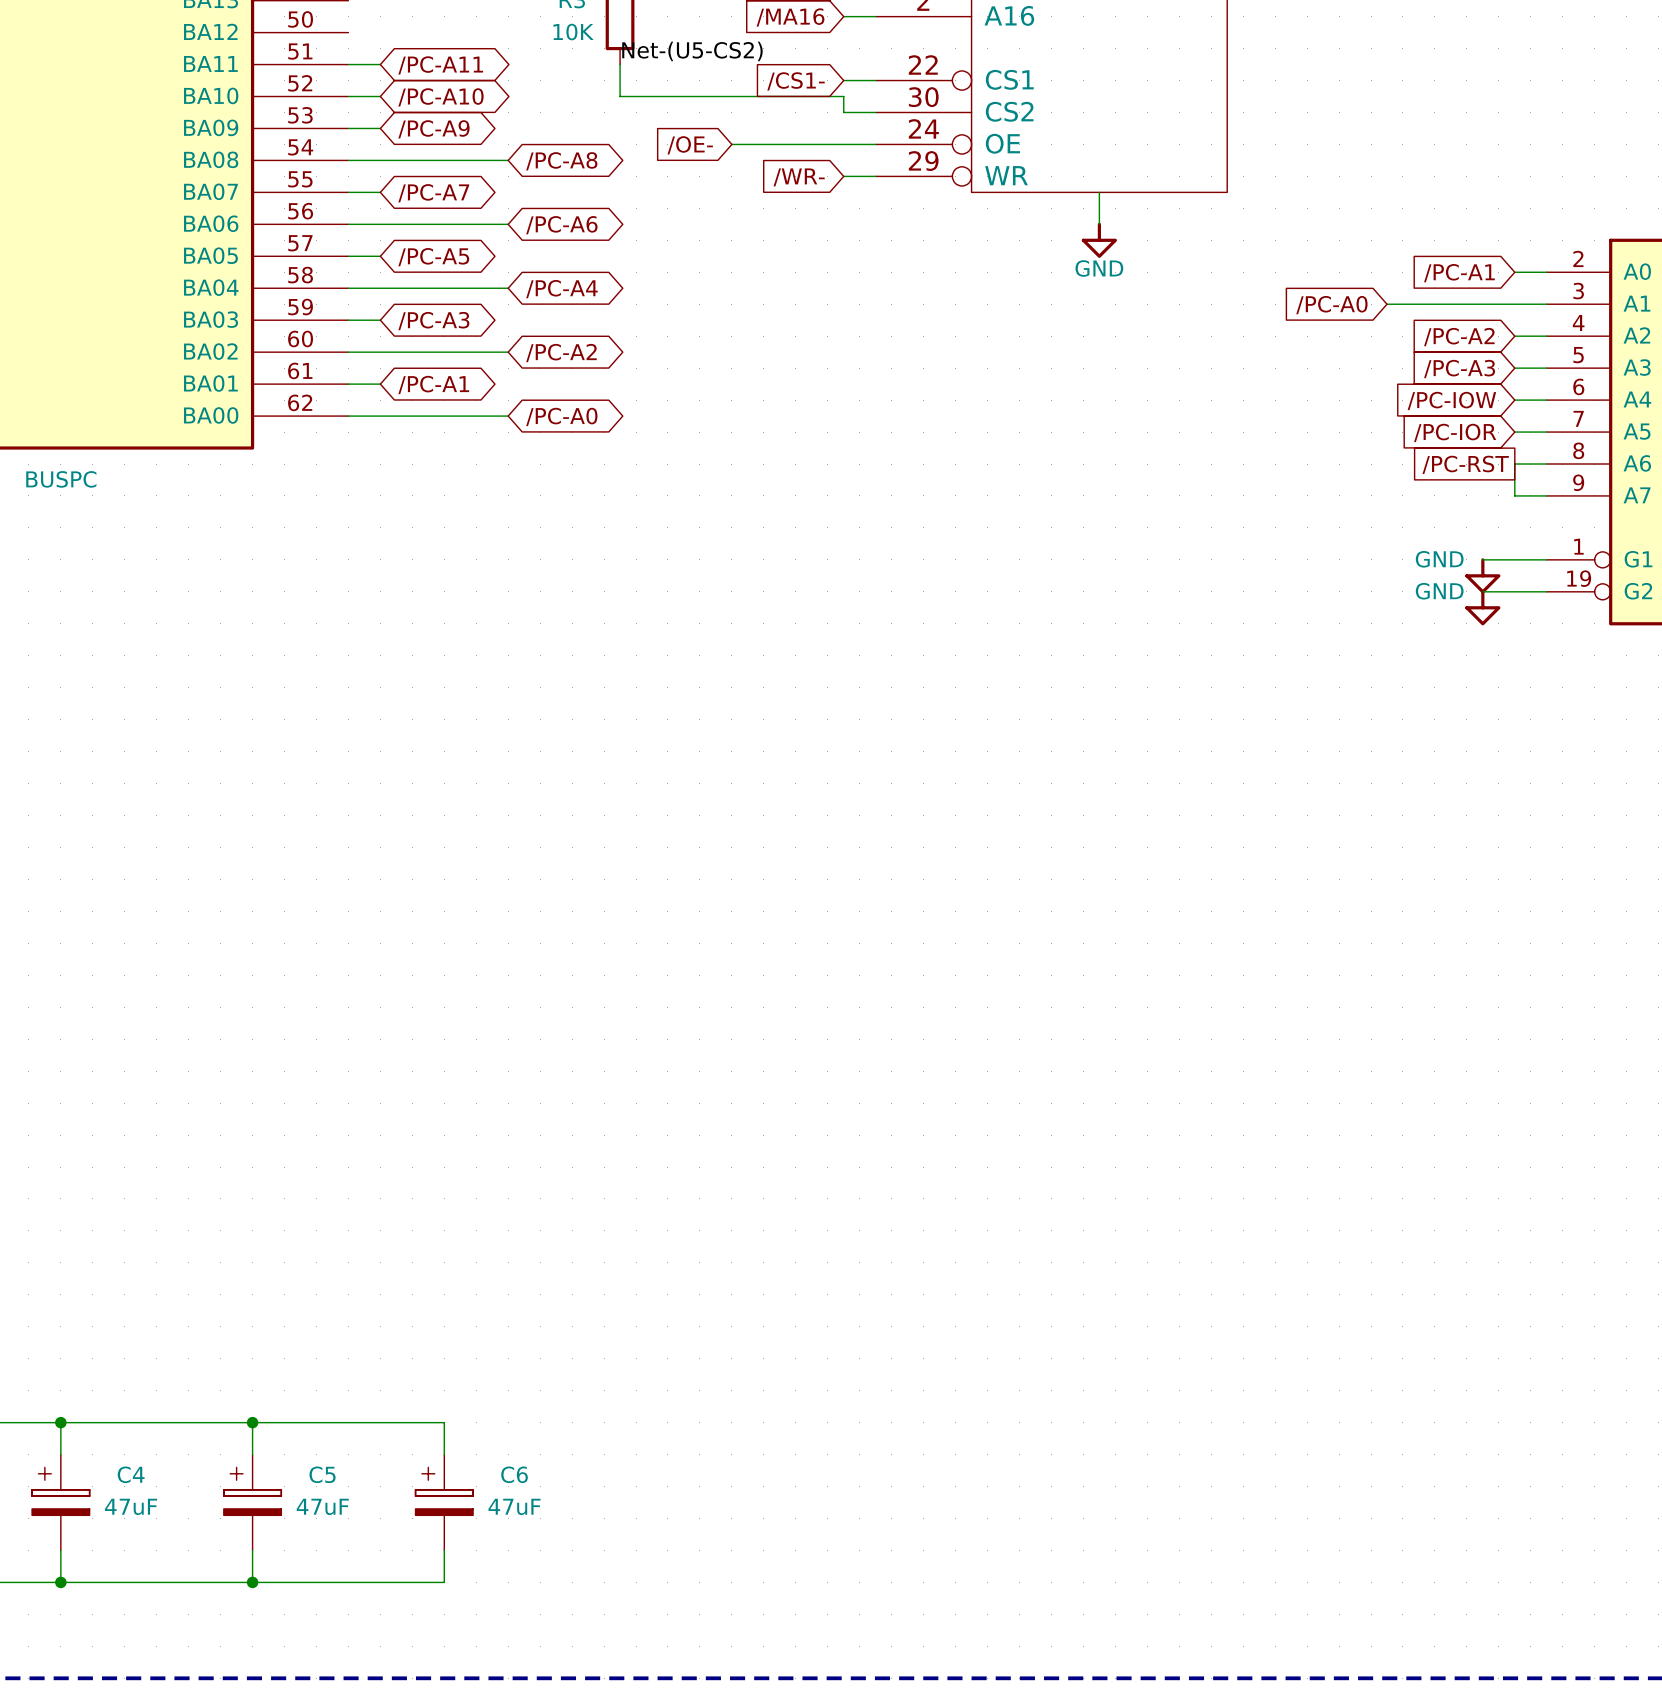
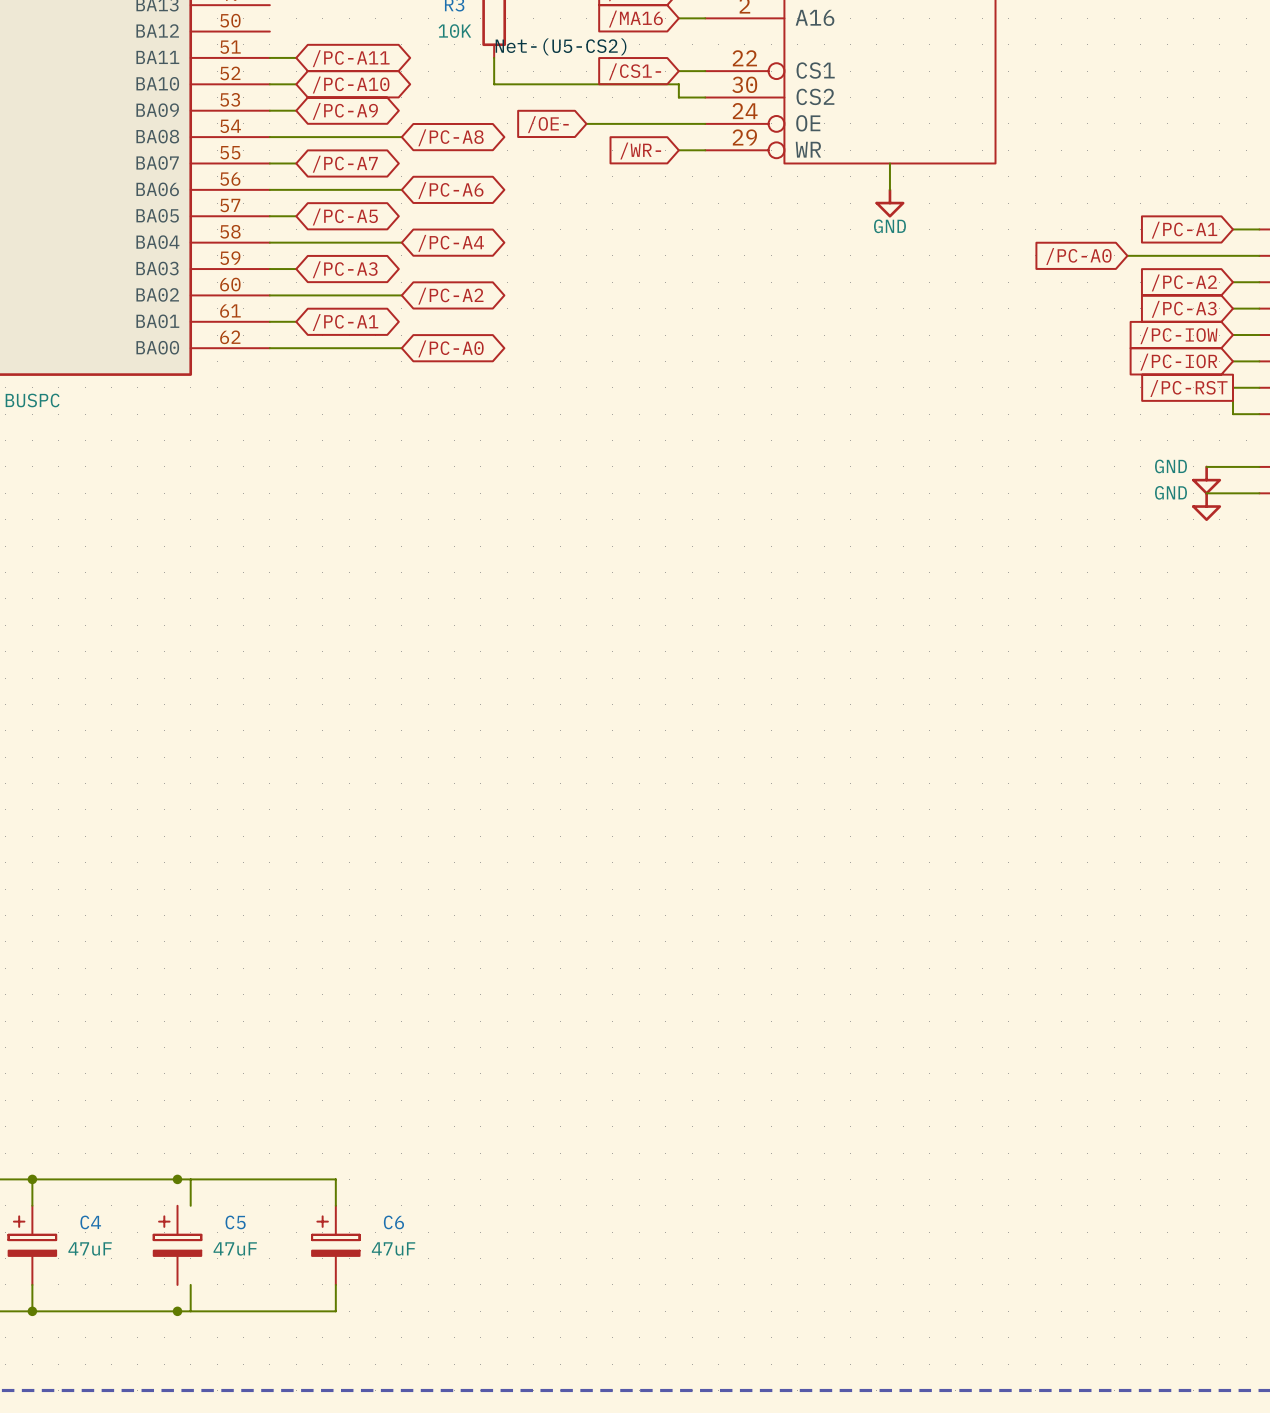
junction position: (252, 1422) -> (177, 1179)
wire: (428, 1422) (444, 1422) (444, 1454) -> (335, 1179) (335, 1205)
C5 position: (252, 1502) -> (177, 1245)
C6 position: (444, 1502) -> (335, 1245)
wire: (444, 1550) (444, 1582) (428, 1582) -> (335, 1284) (335, 1311)
junction position: (252, 1582) -> (177, 1311)

